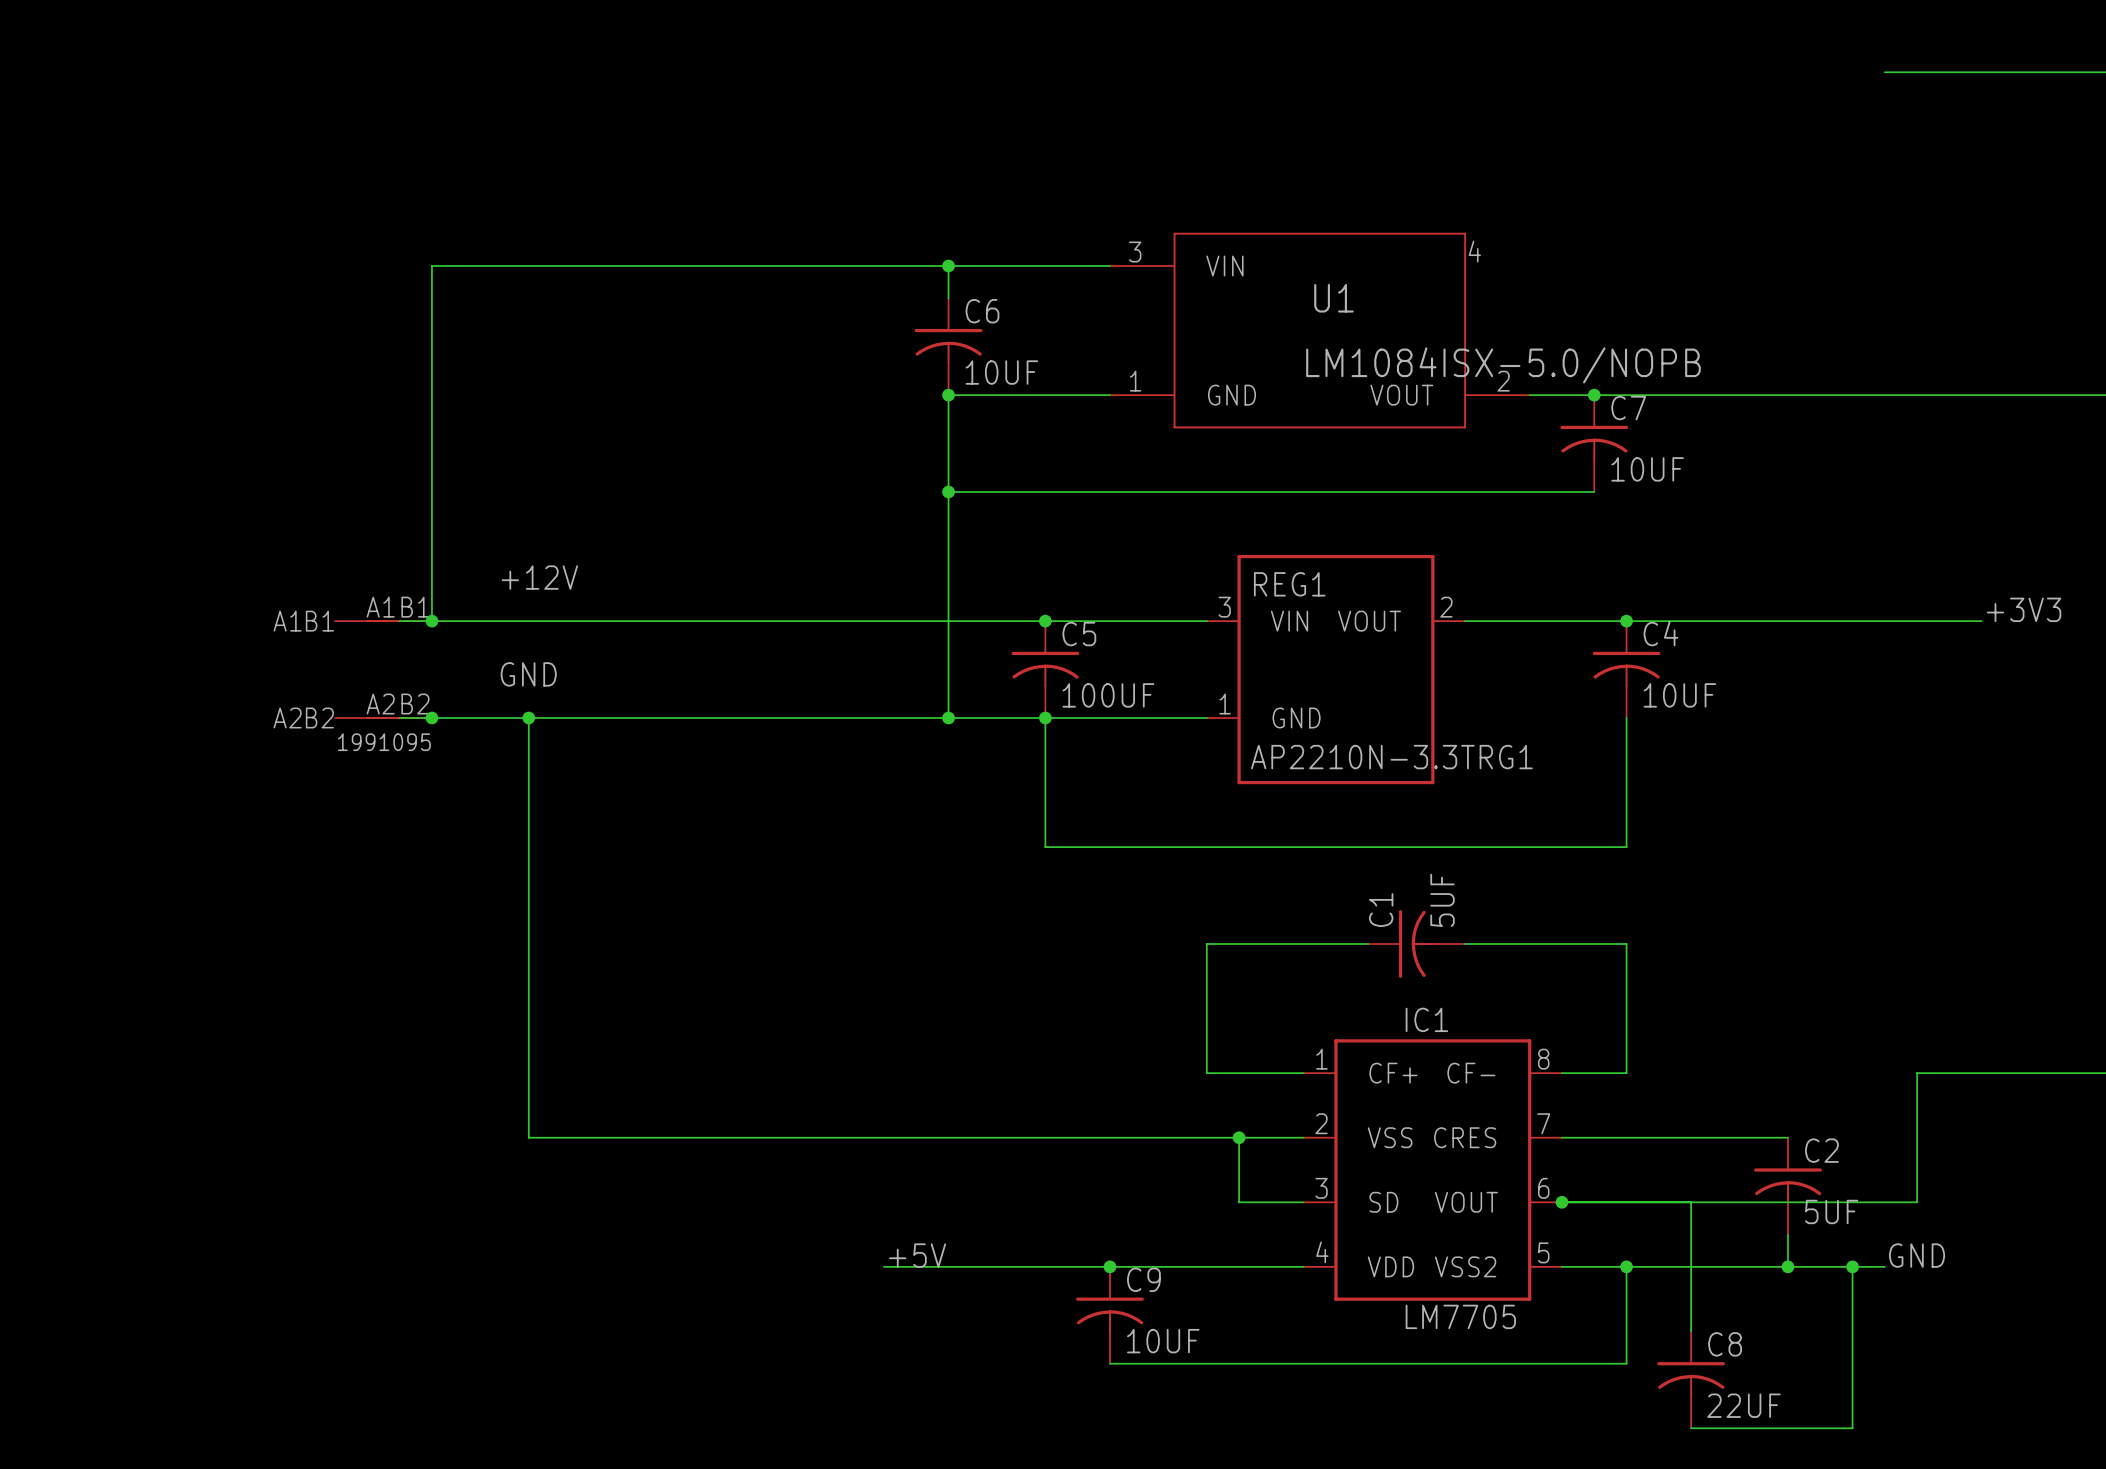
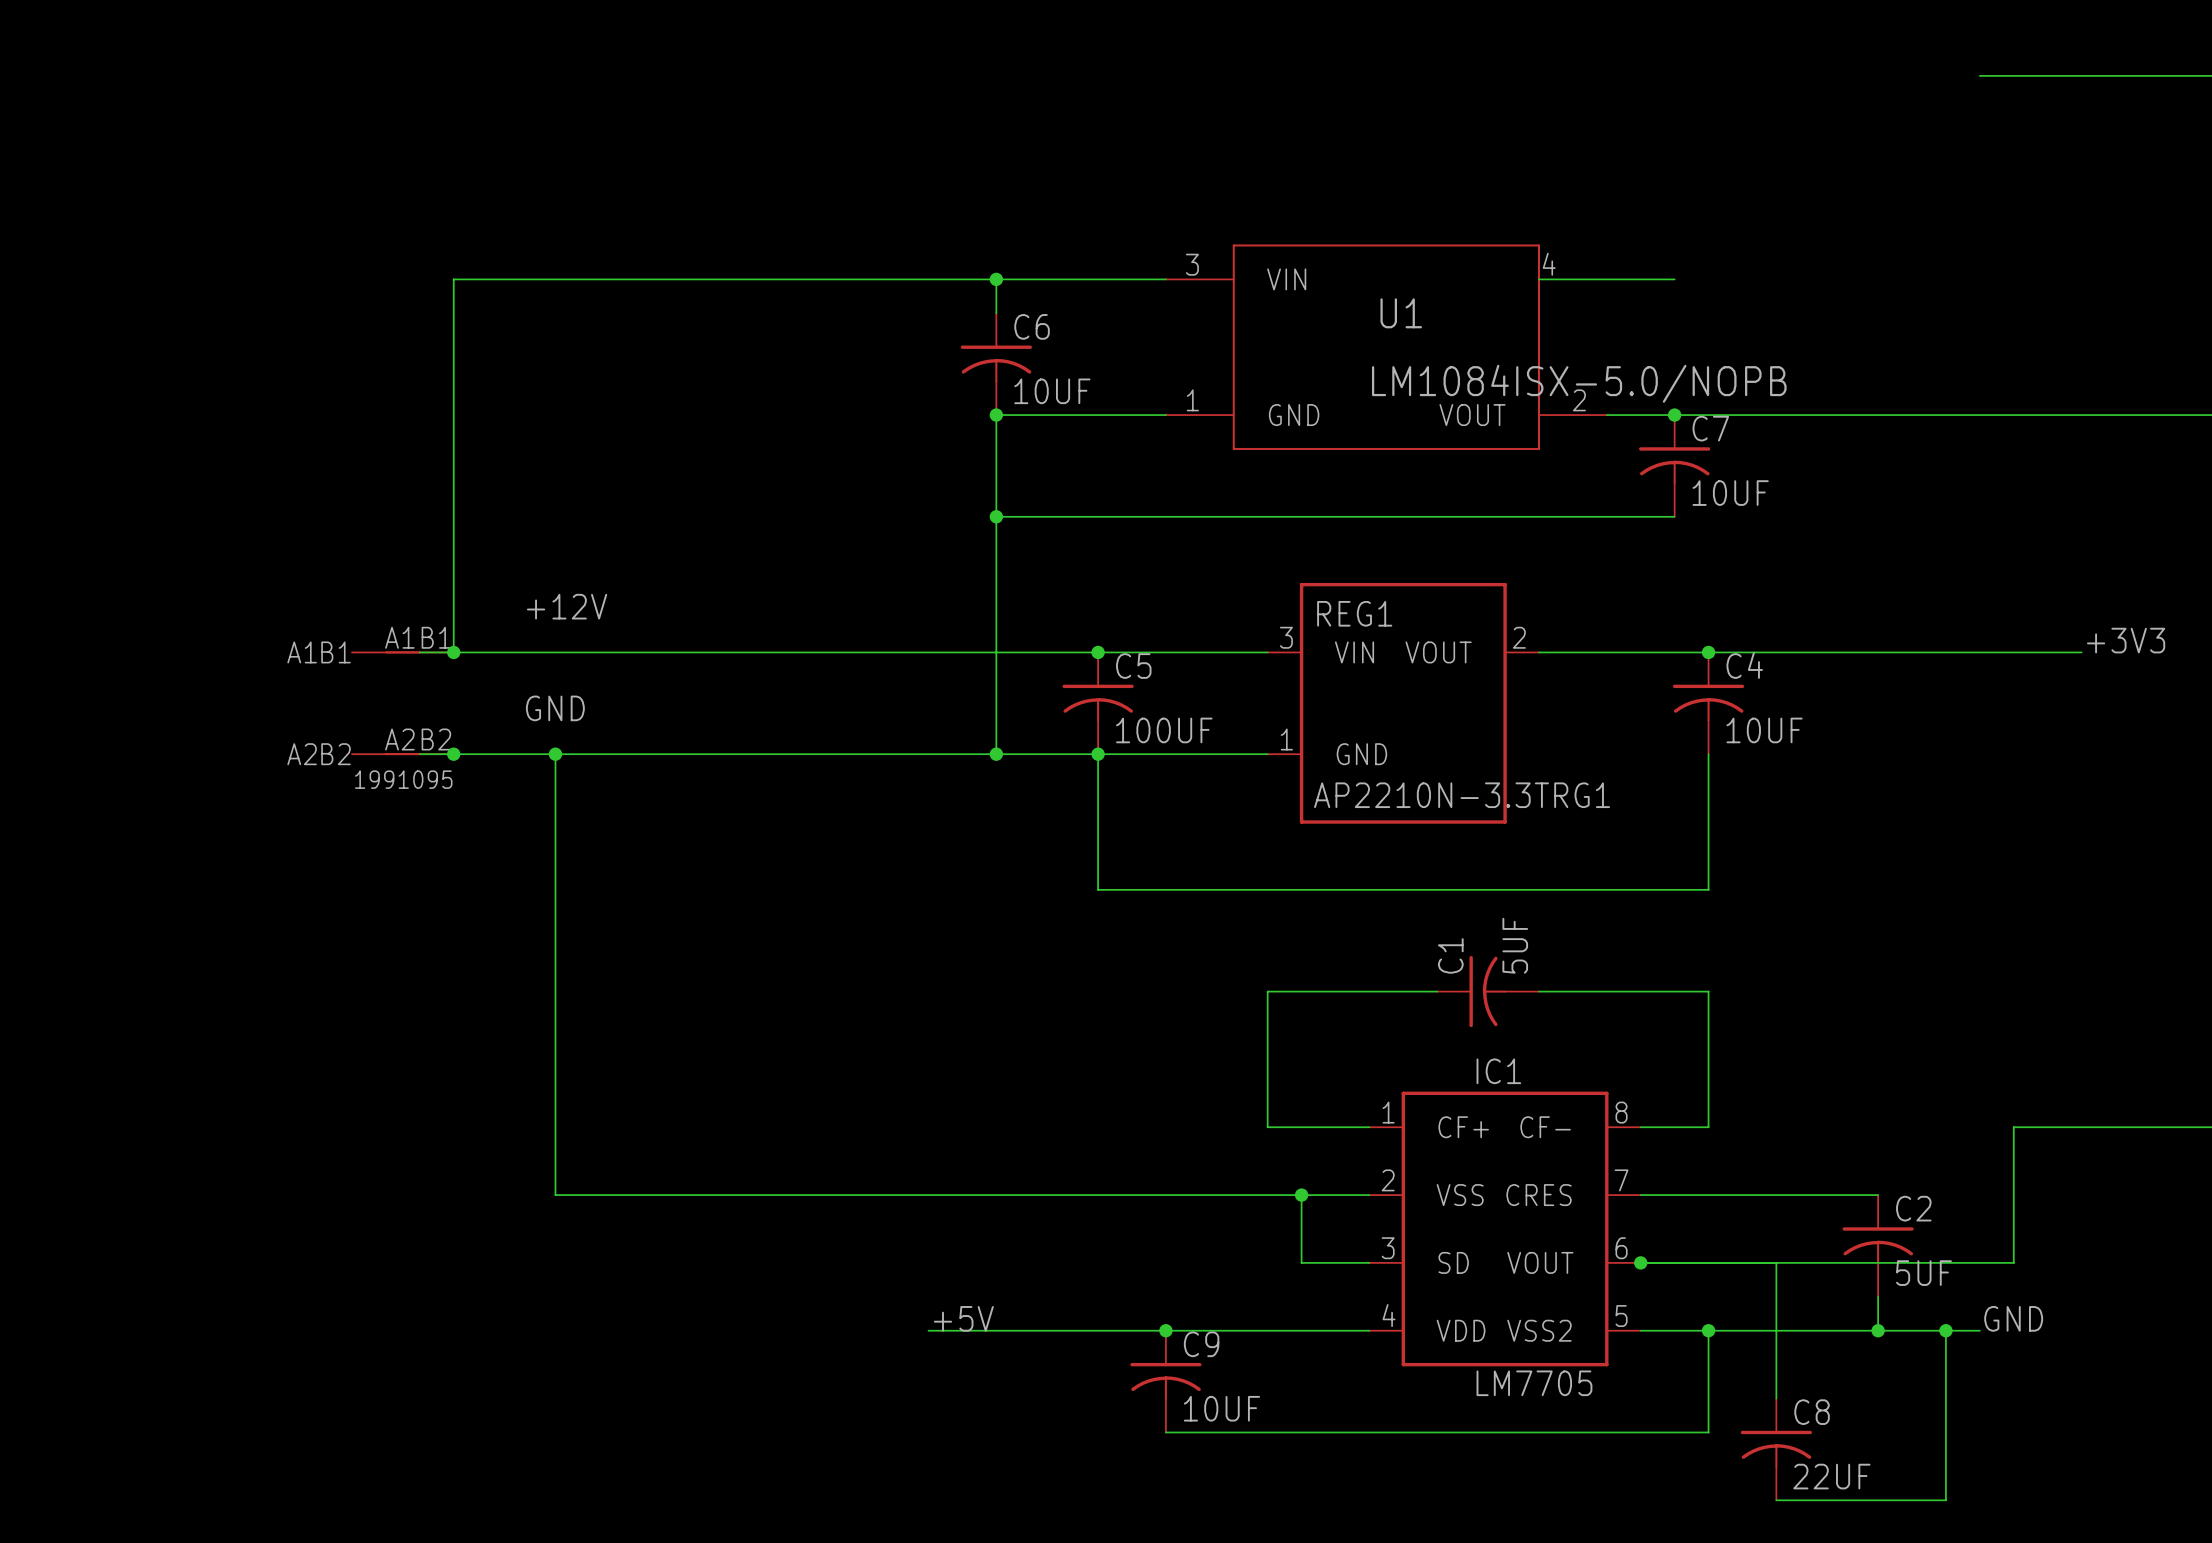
wire: none -> (1538, 279) (1674, 279)

